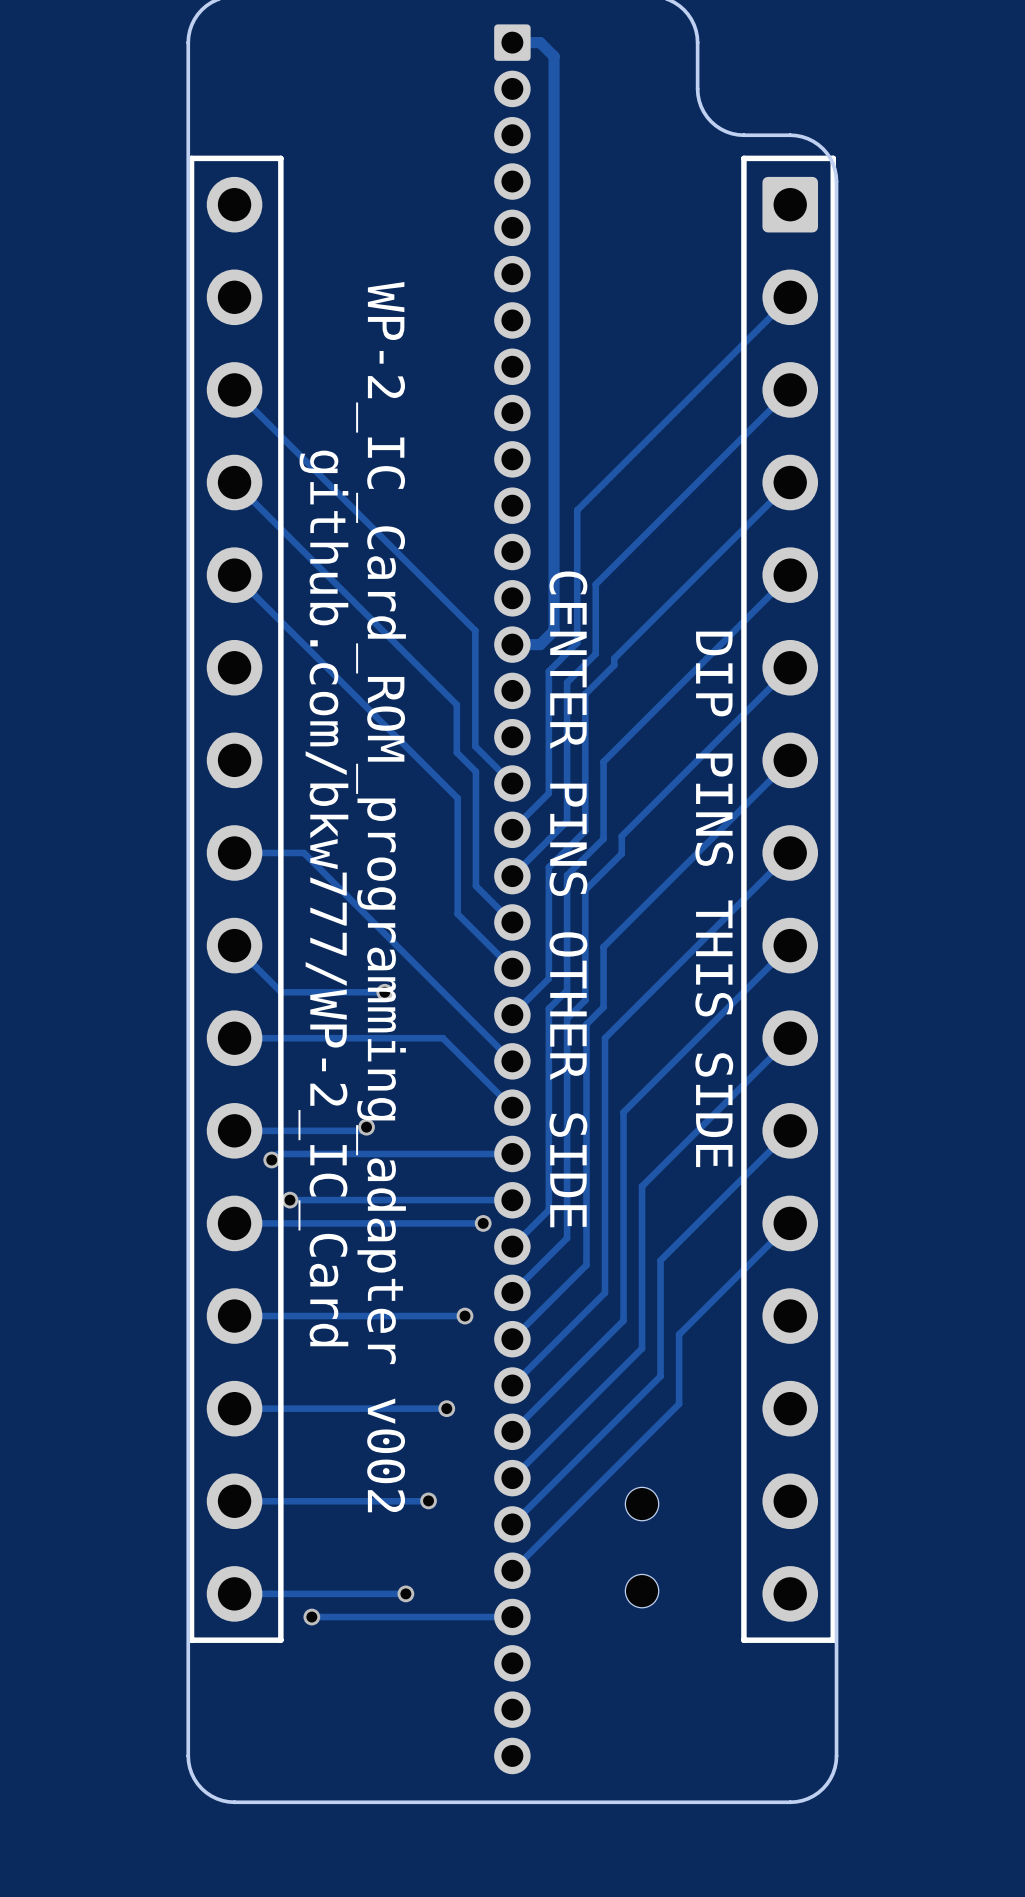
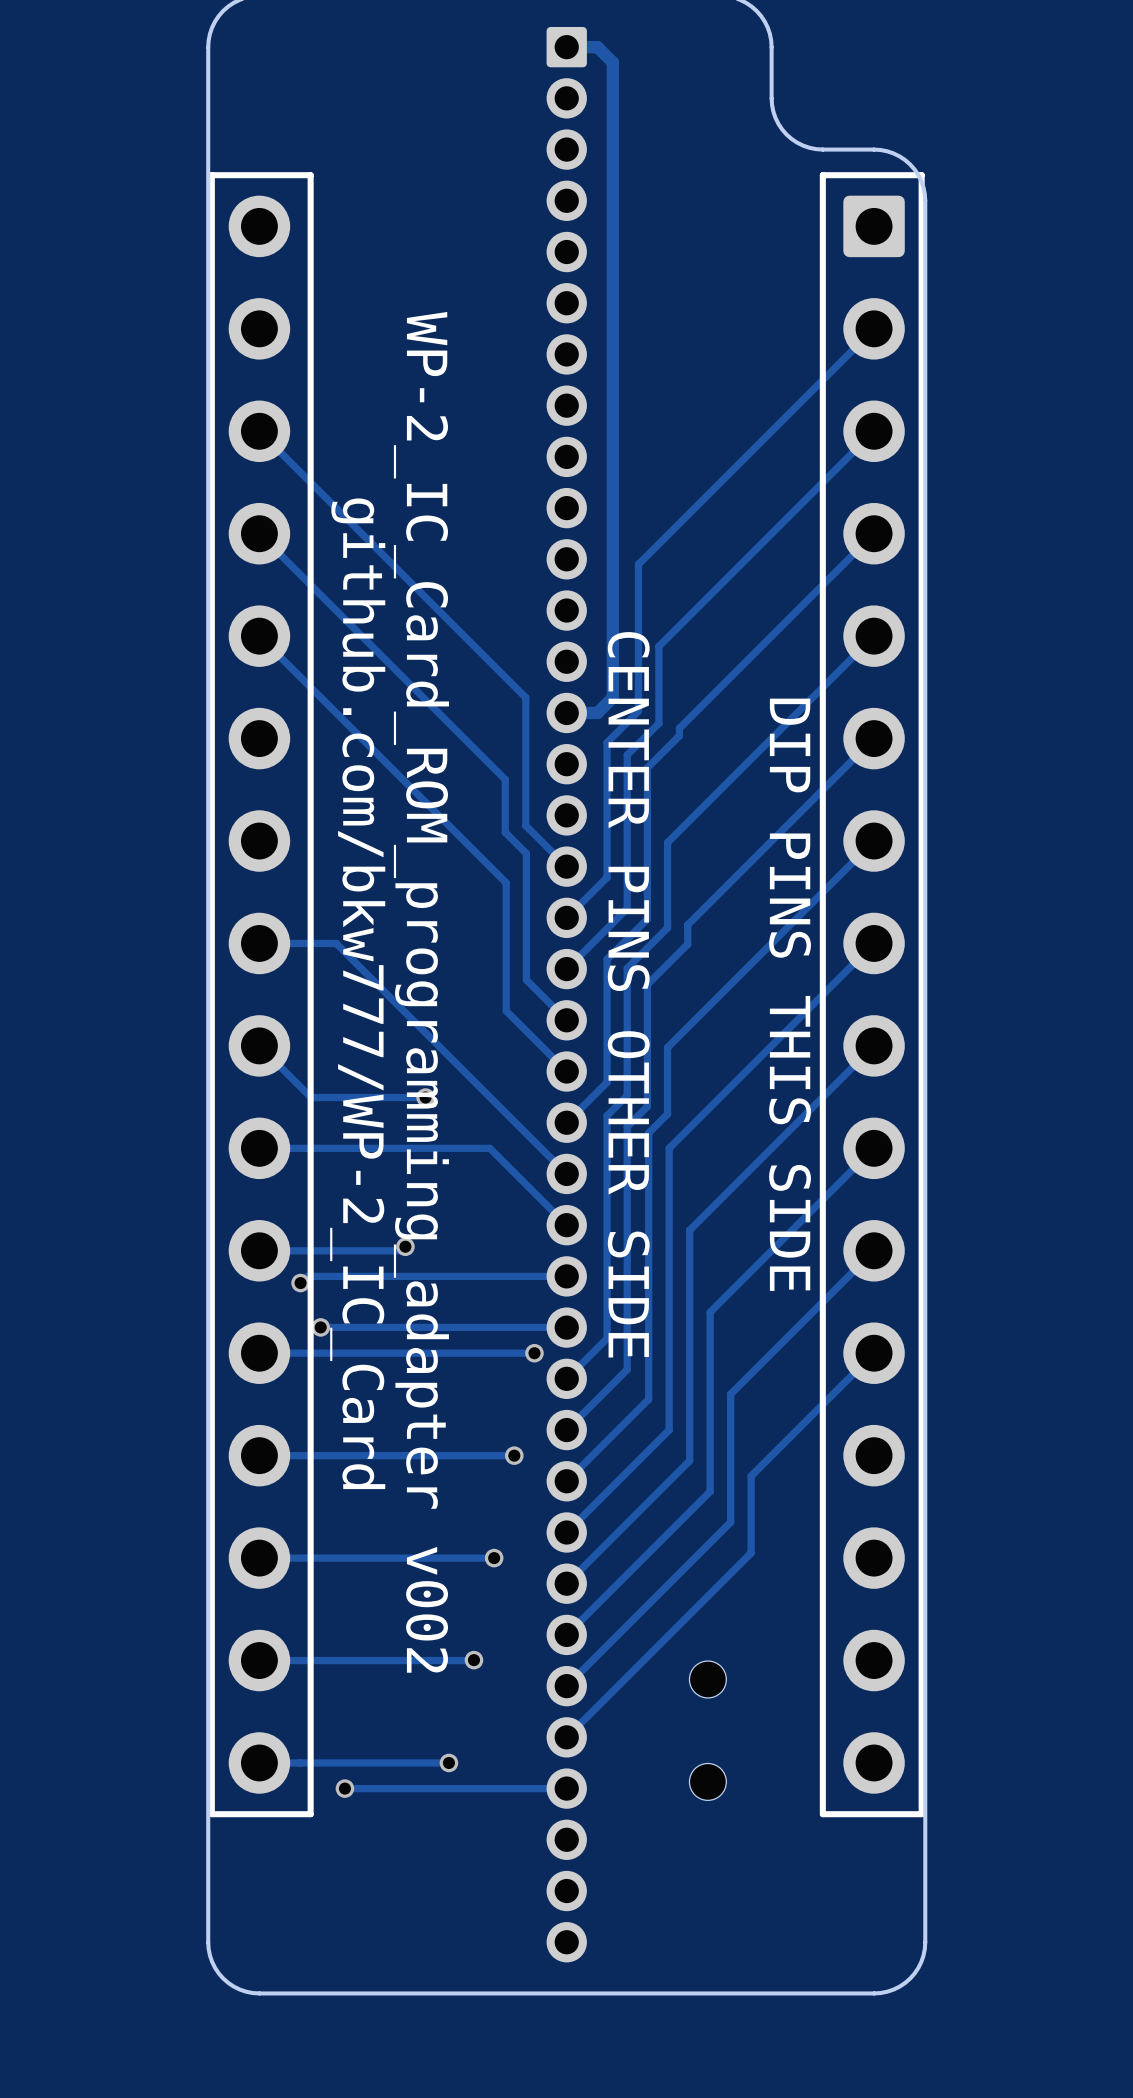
part footprint: [625, 1487, 659, 1608] -> [689, 1661, 727, 1801]

